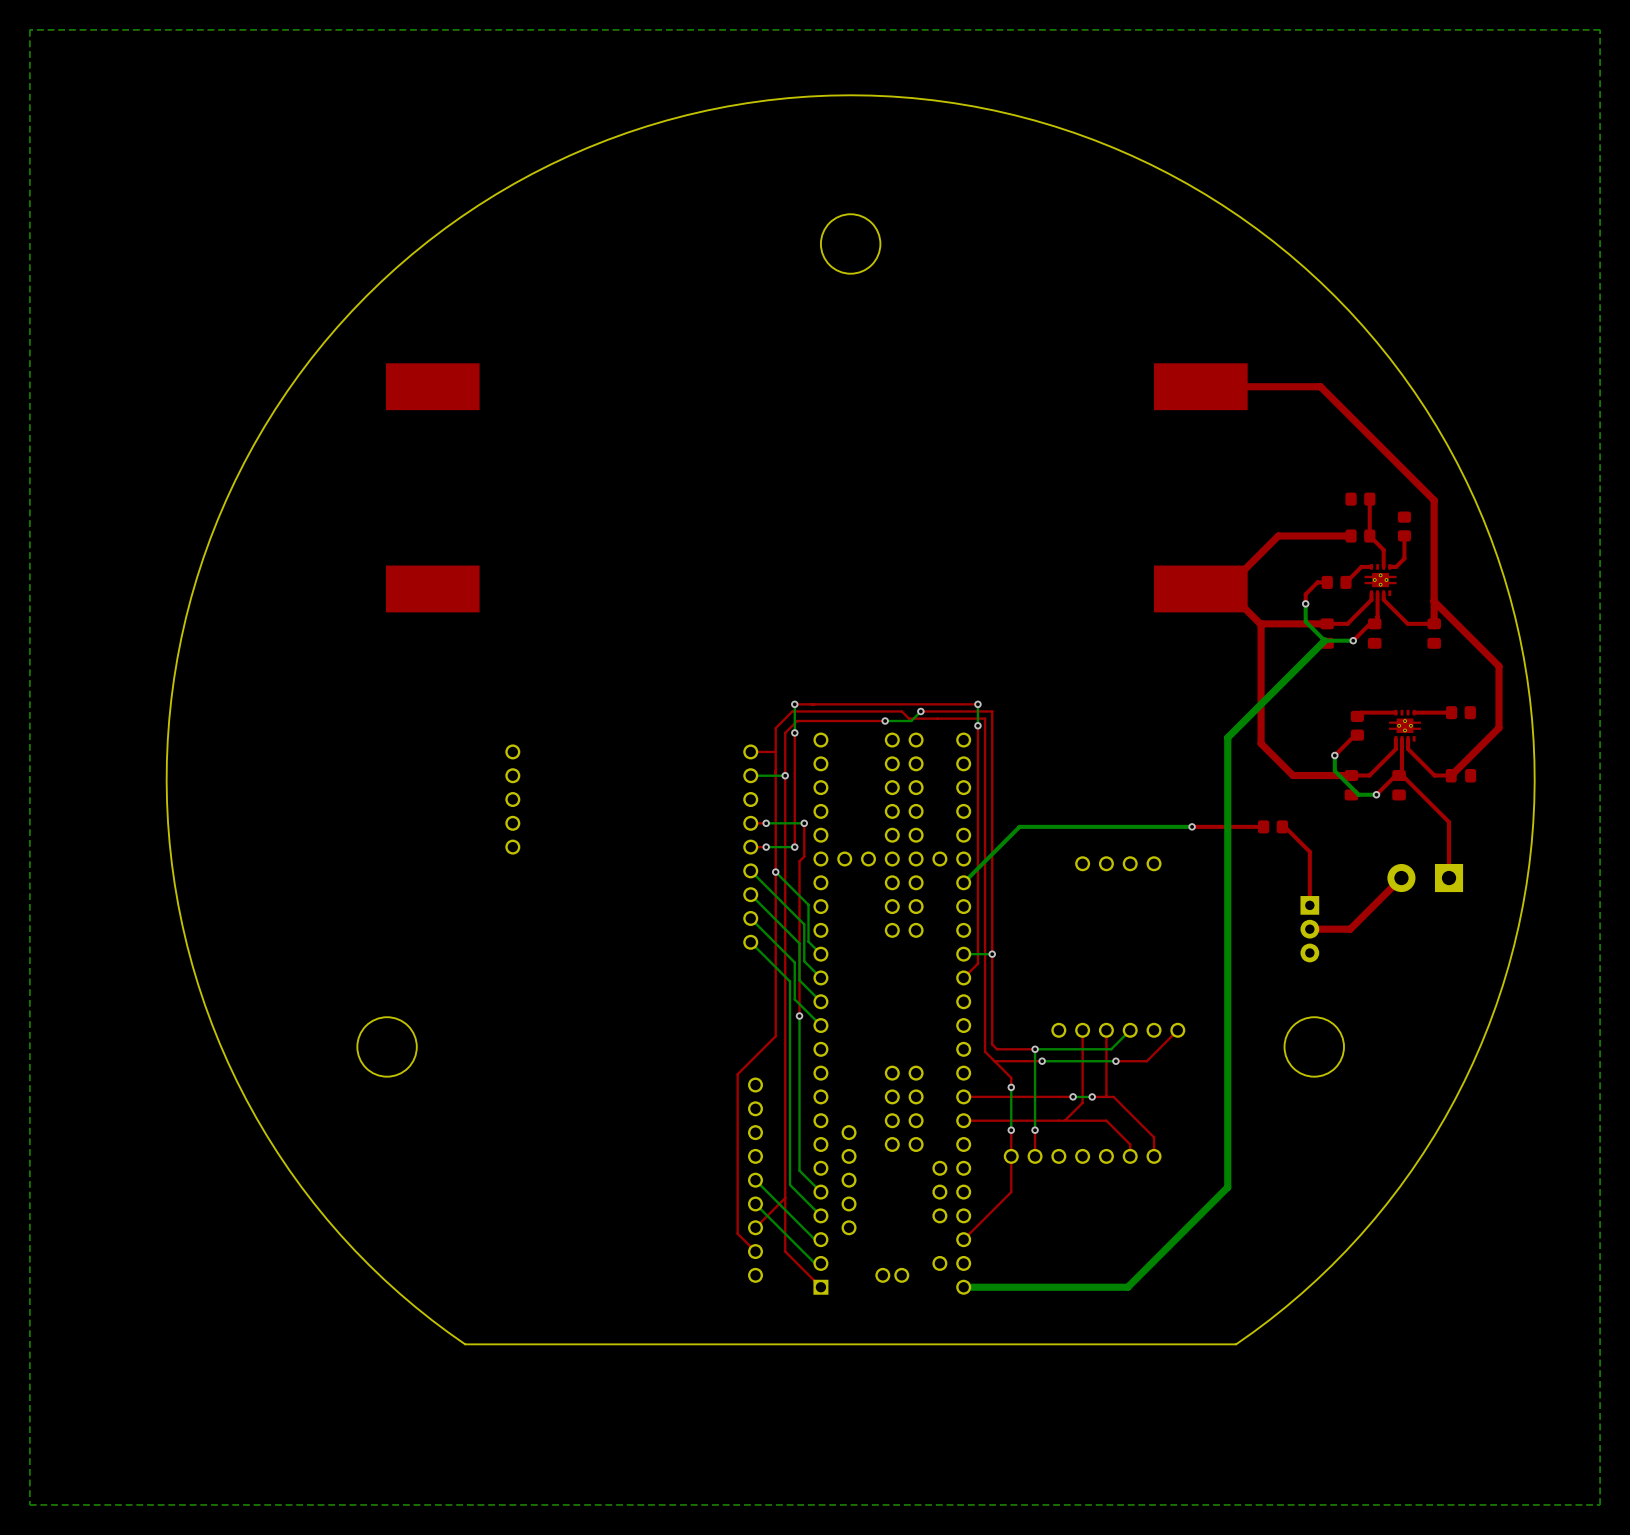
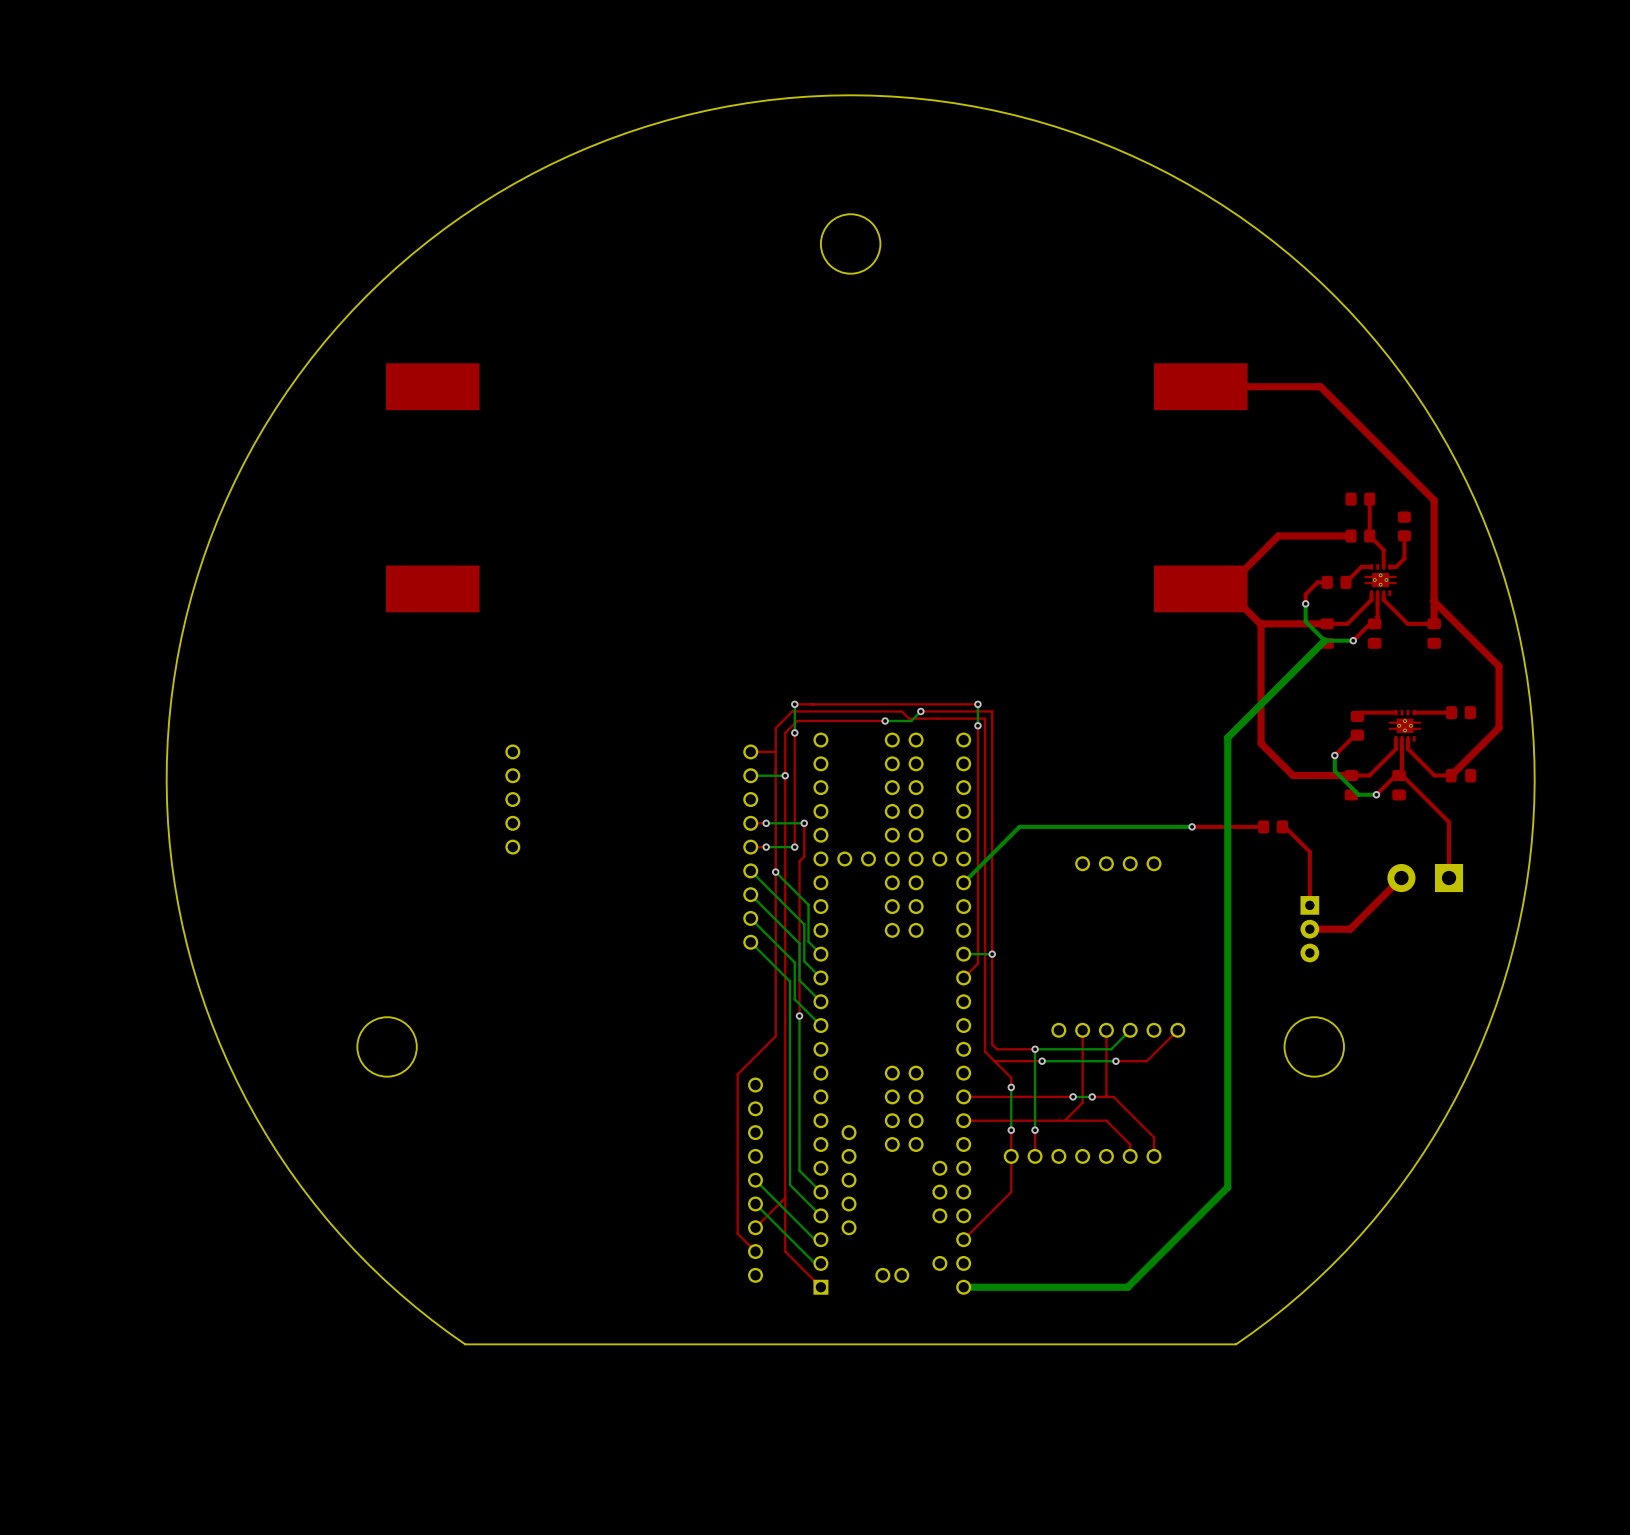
bottom zone outline: (1600, 29) (29, 29) (29, 1504) (1600, 1504) (1600, 29) -> none

